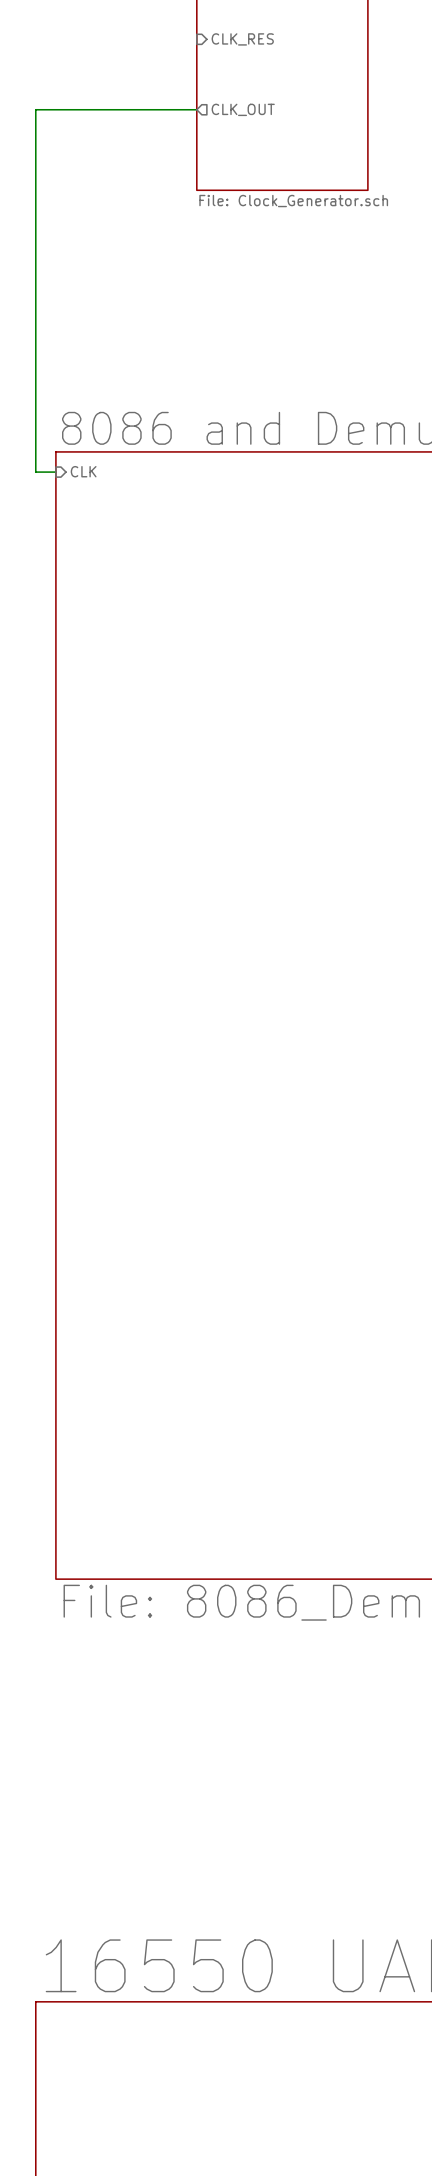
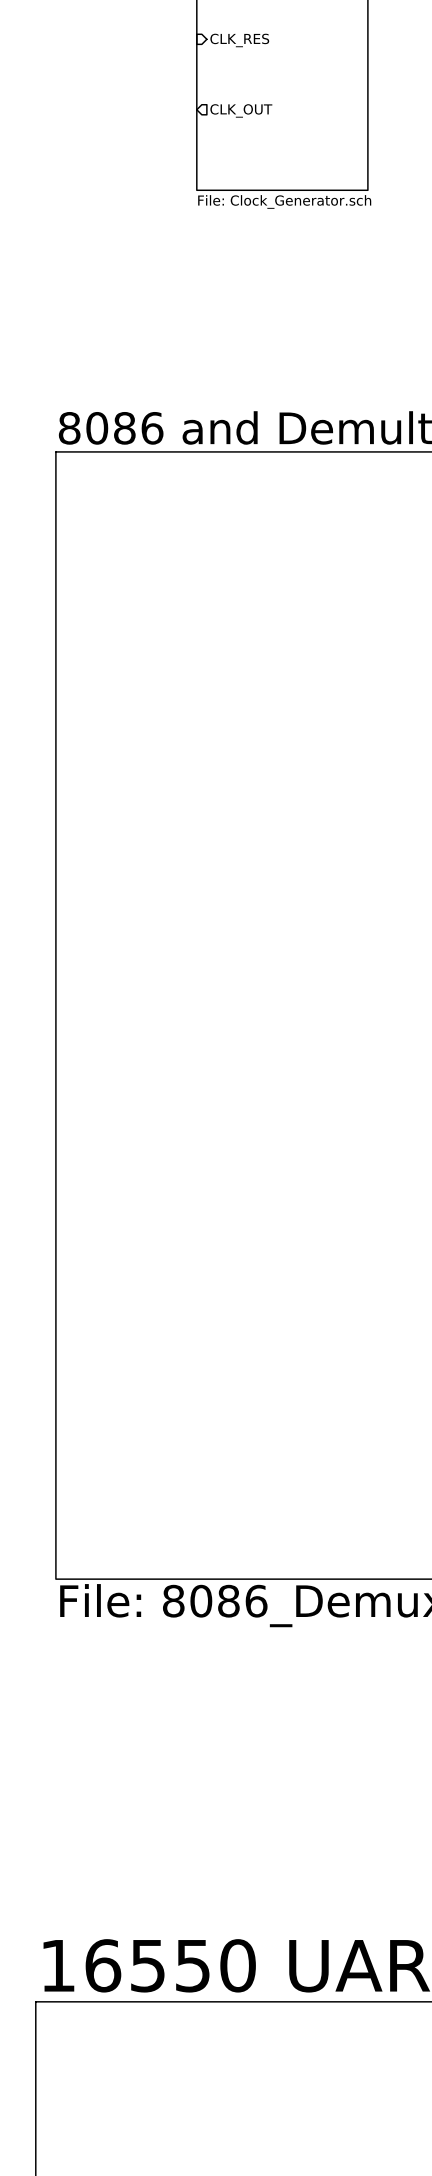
wire: (196, 109) (35, 109) (35, 472) (55, 472) -> none
sheet pin: CLK (83, 471) -> none

